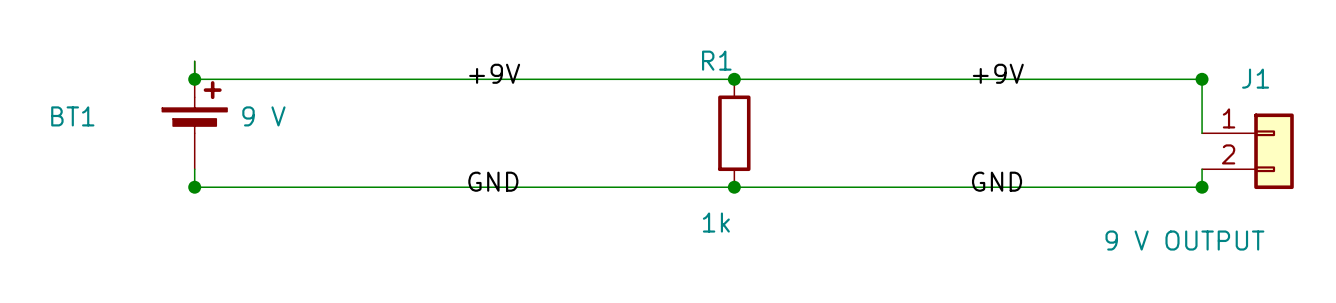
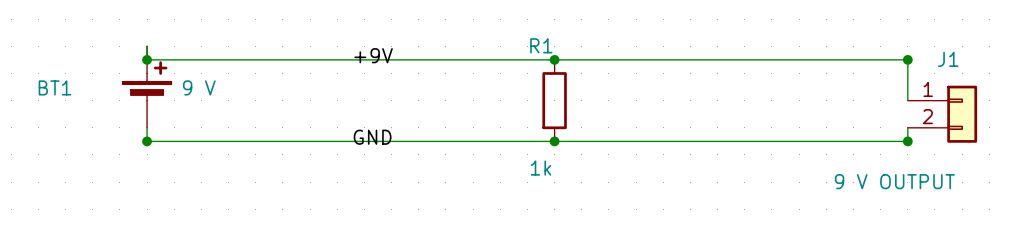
label: +9V (998, 73) -> none
label: GND (997, 181) -> none

